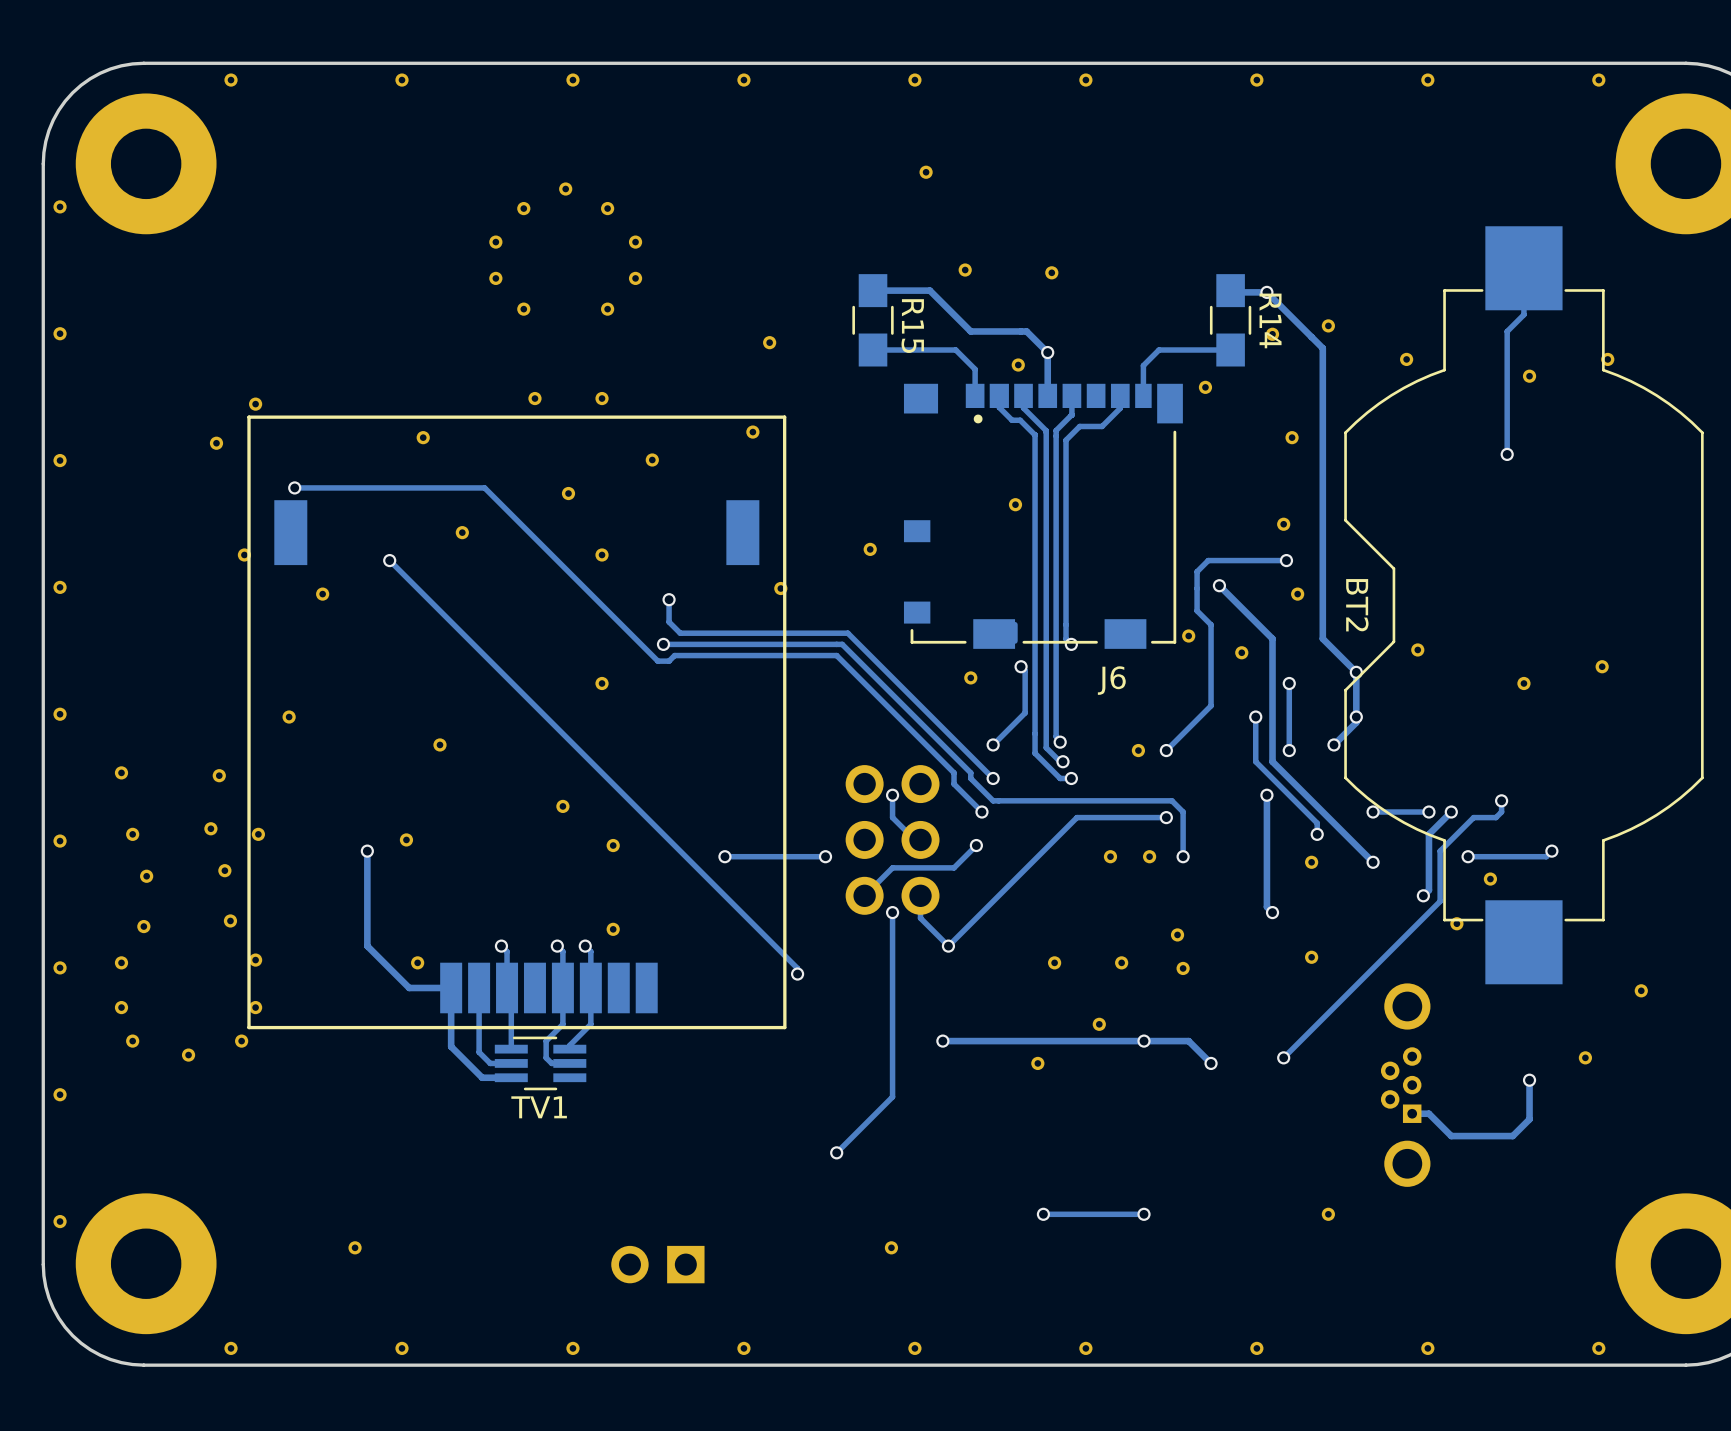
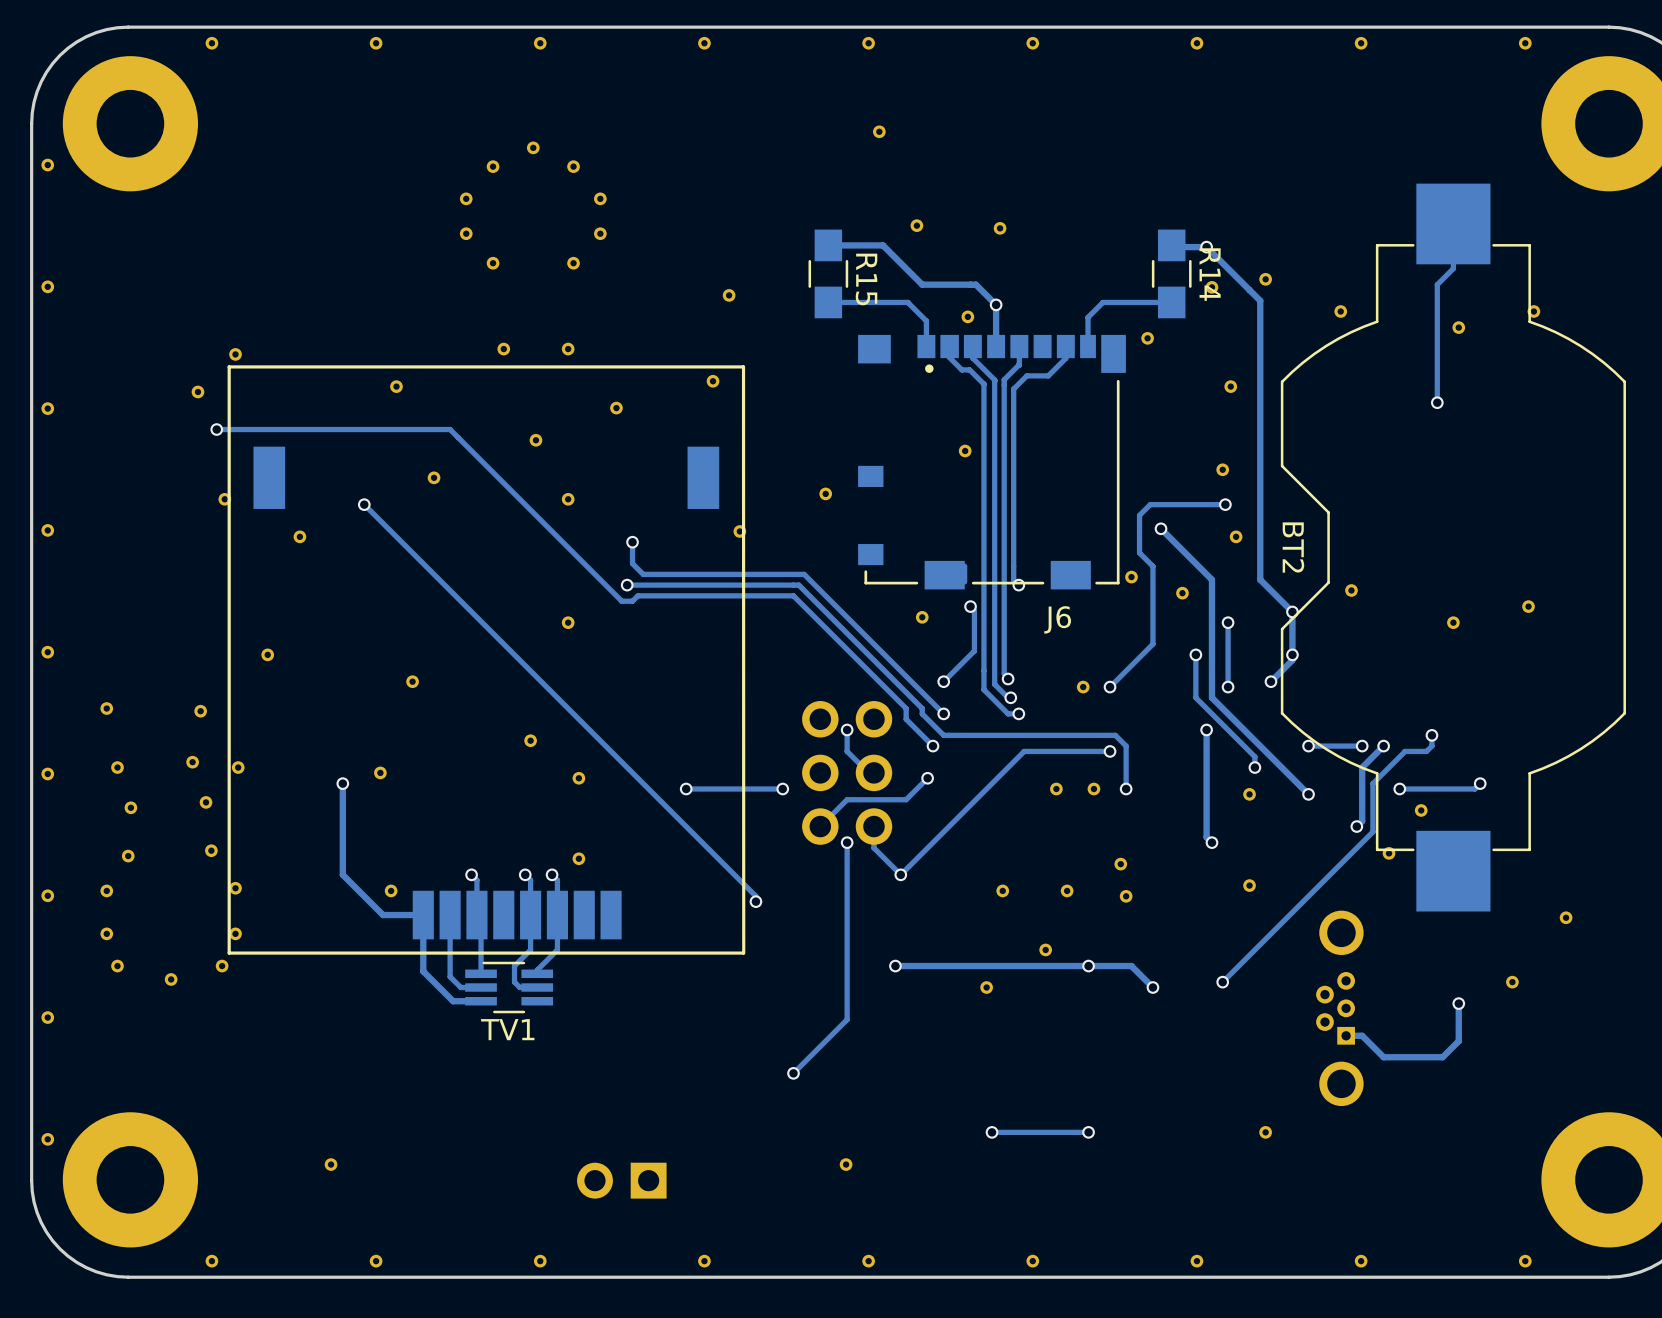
via position: (294, 487) -> (216, 429)
track: (484, 487) (294, 487) -> (455, 434) (450, 429) (216, 429)

